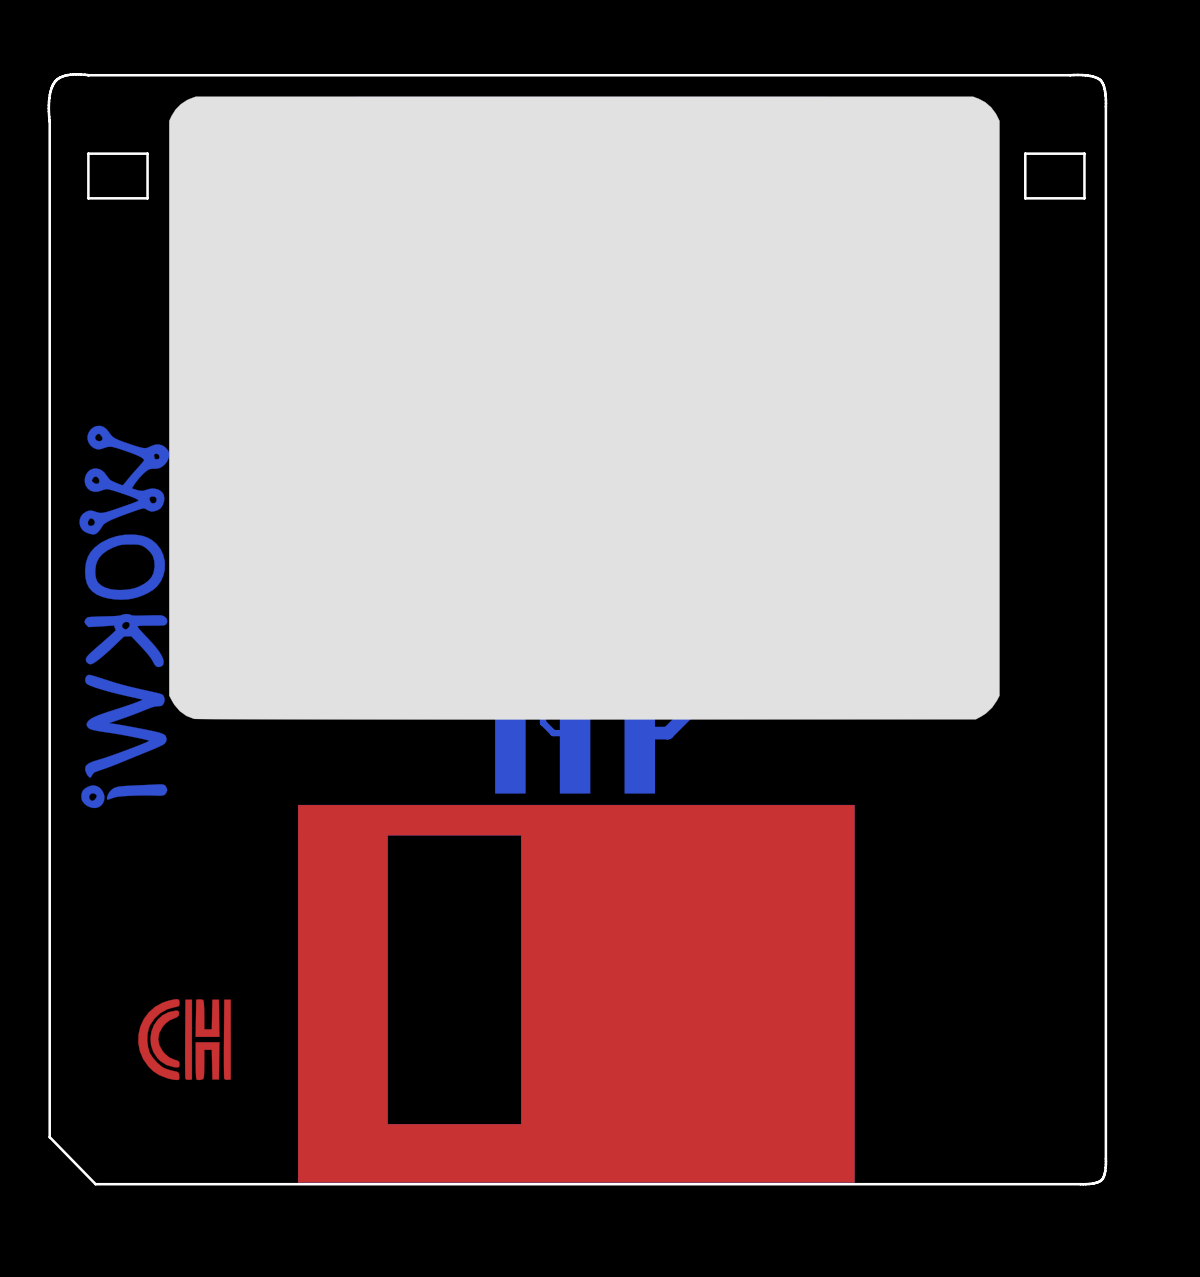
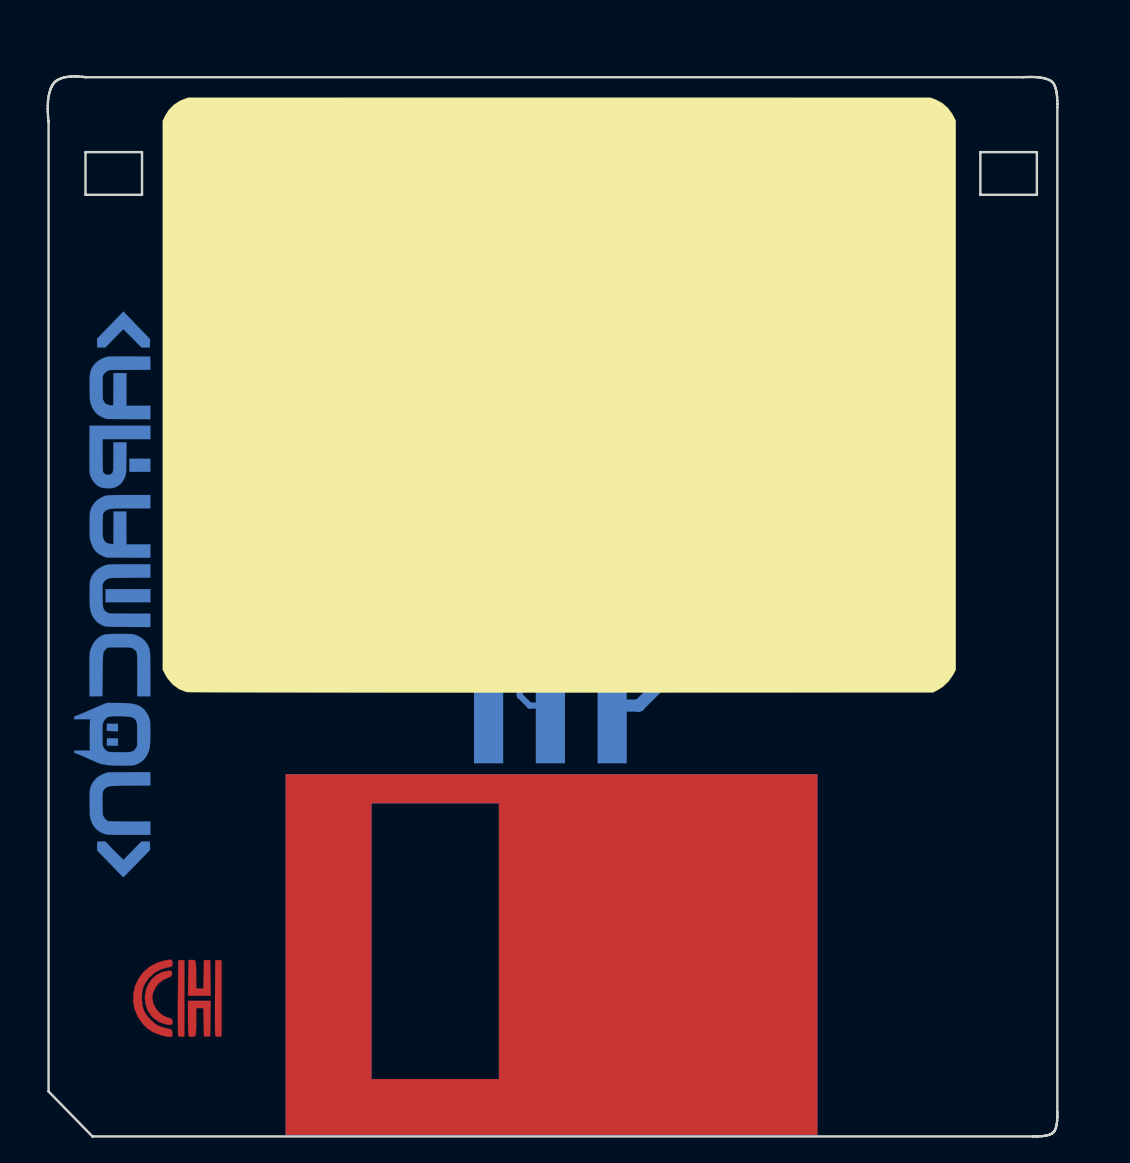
drawing shape: [79, 425, 170, 809] -> [74, 311, 151, 878]

